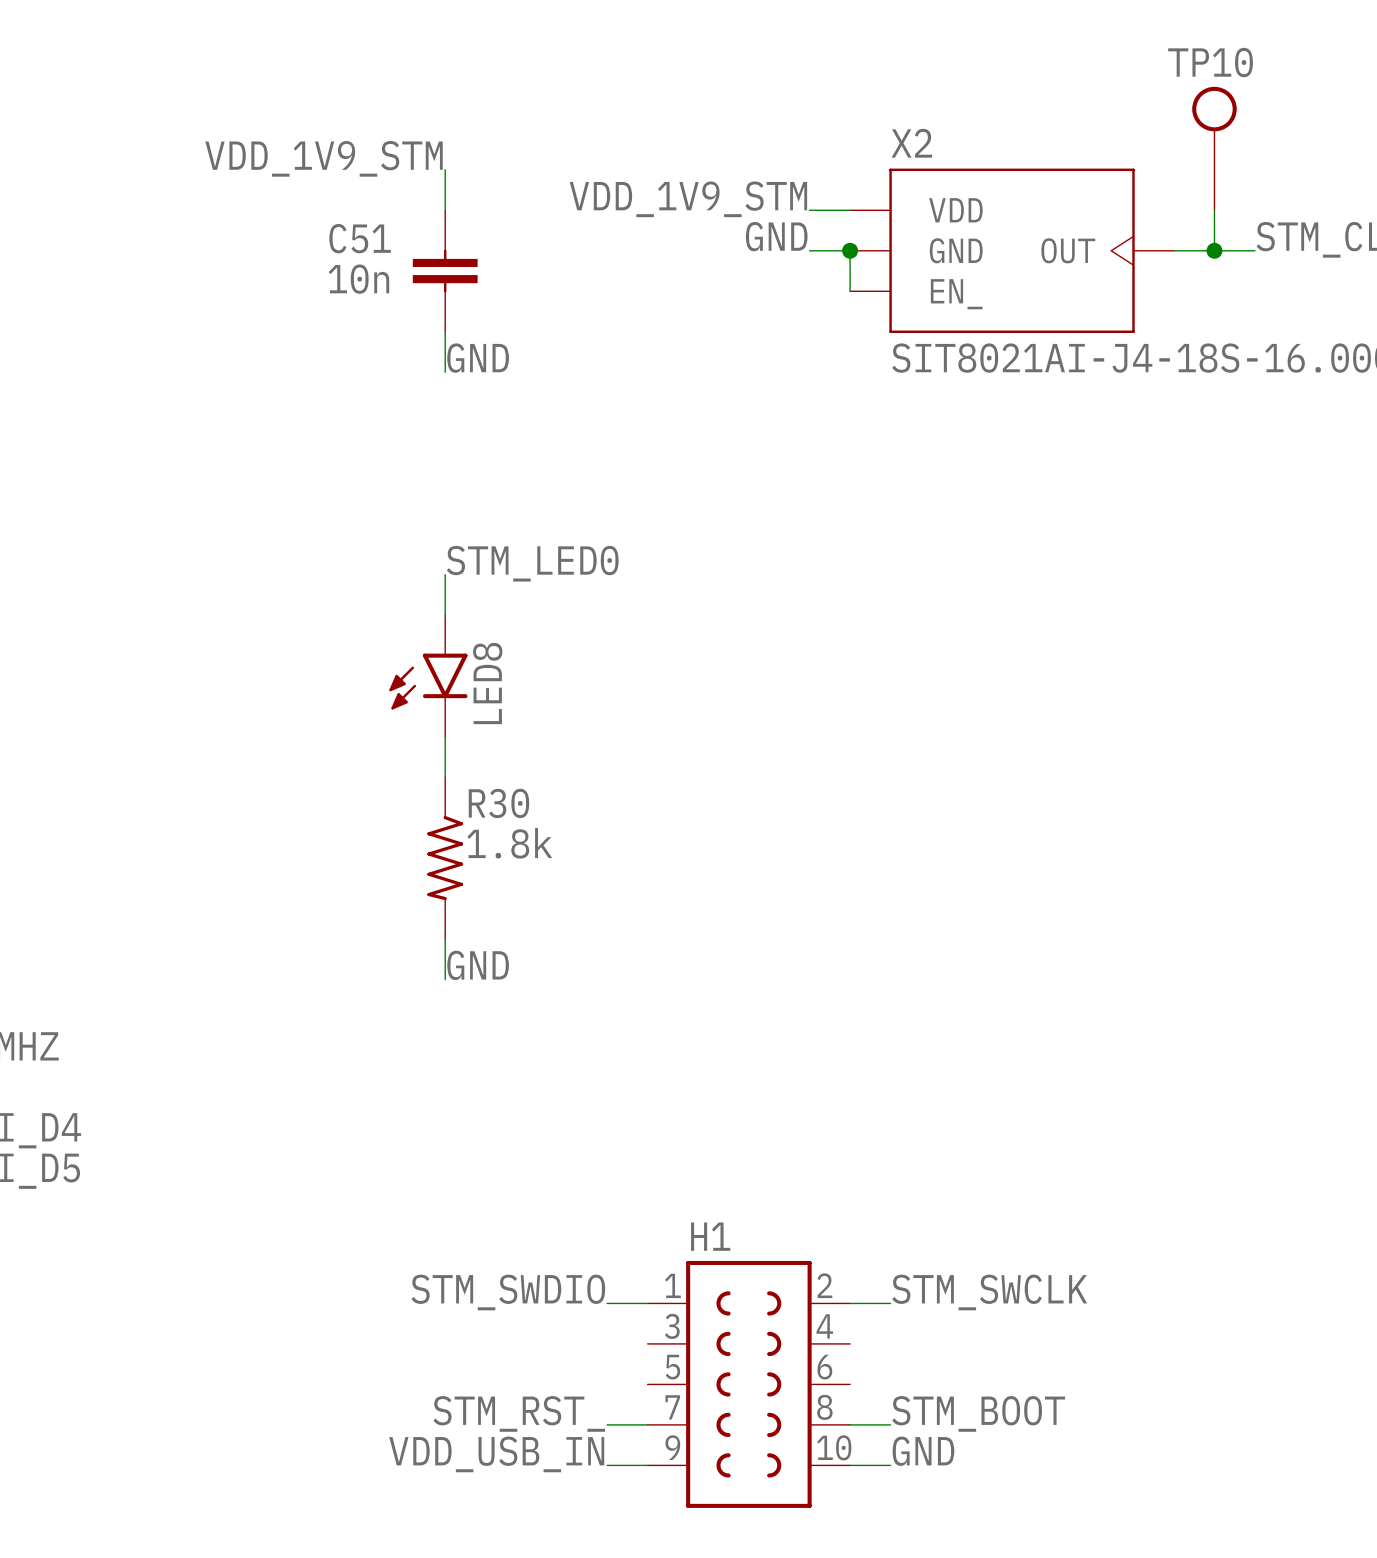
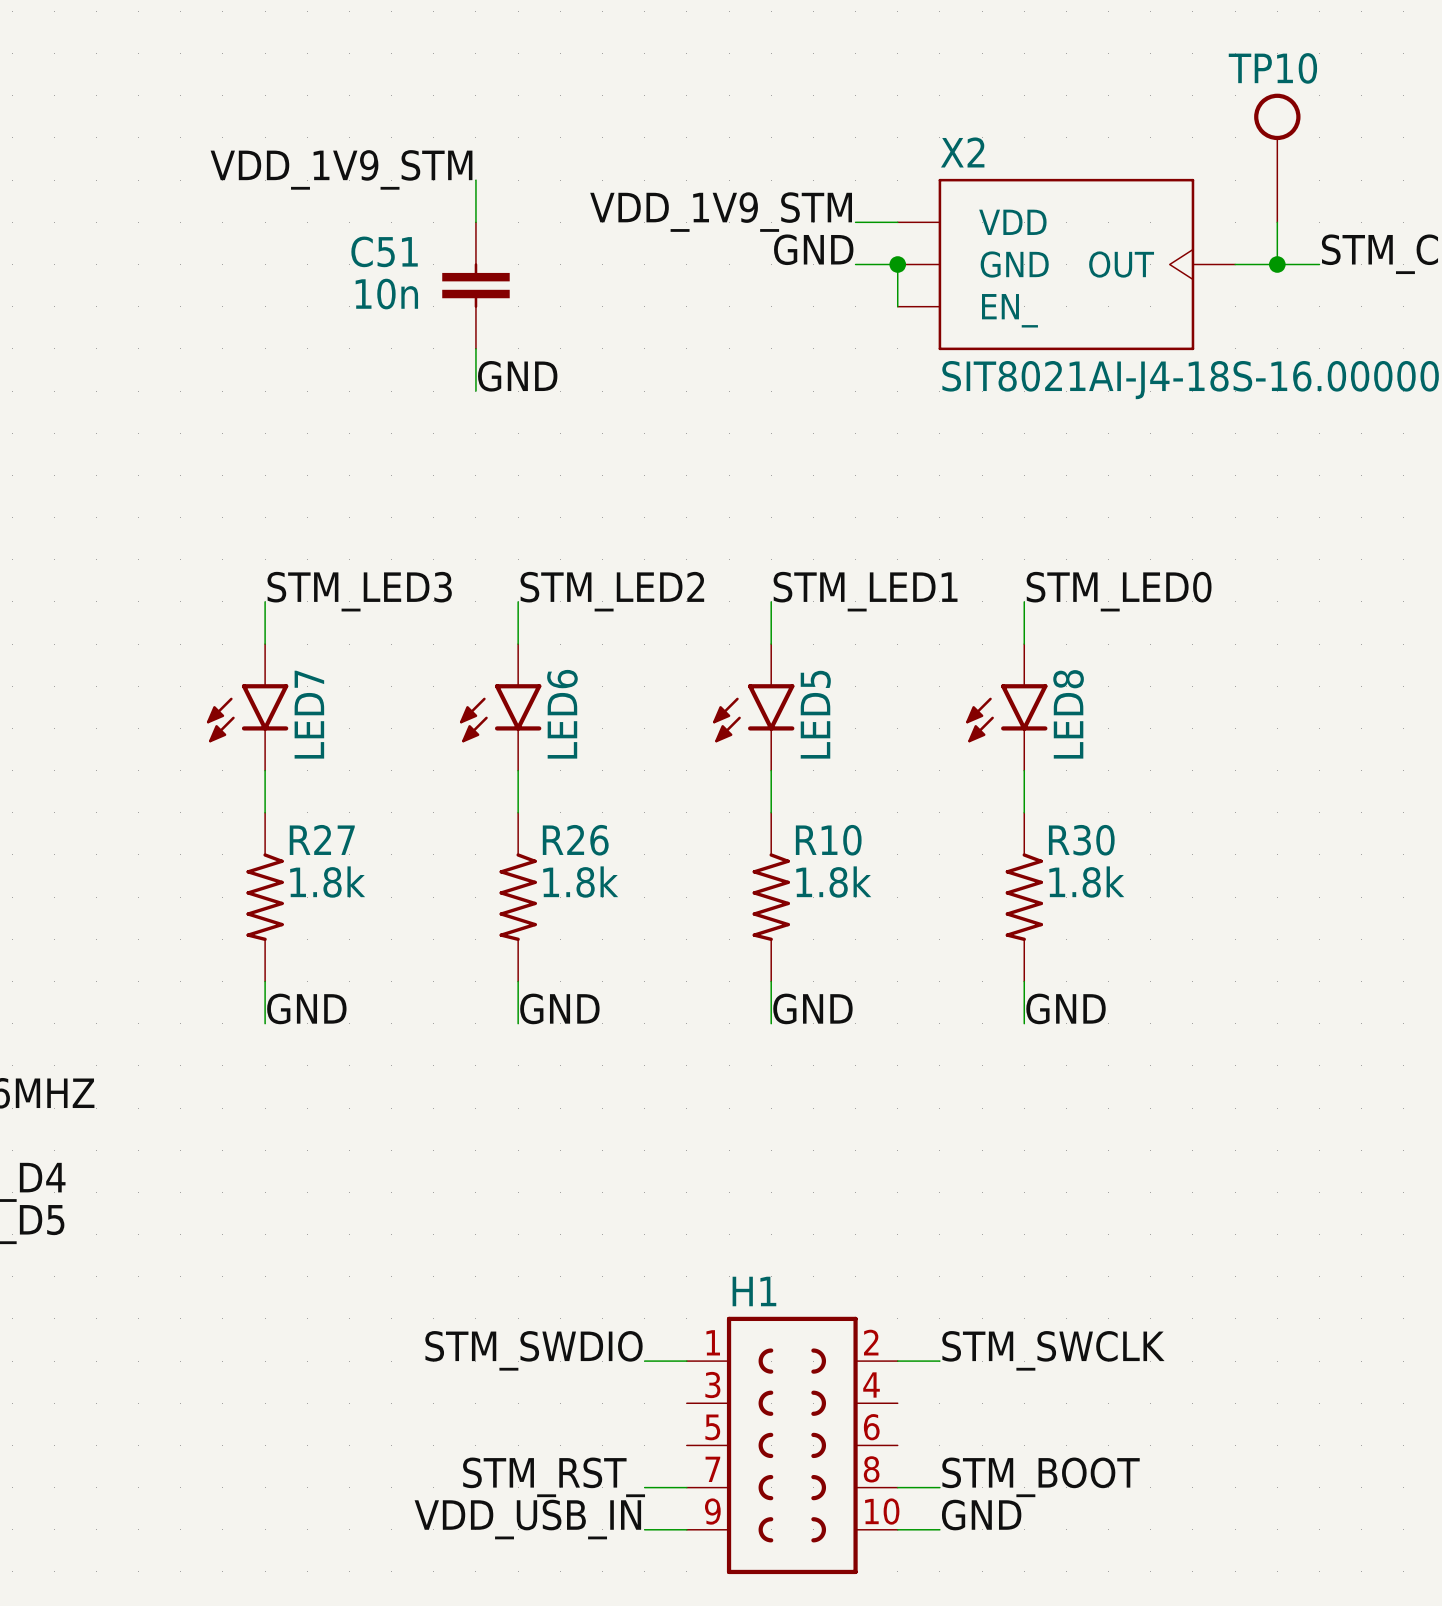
label: none -> STM_LED3 (359, 591)
label: STM_LED0 (532, 563) -> STM_LED2 (612, 591)
label: none -> STM_LED1 (865, 591)
label: none -> STM_LED0 (1119, 591)
wire: none -> (265, 601) (265, 644)
wire: (445, 574) (445, 615) -> (518, 601) (518, 644)
wire: none -> (771, 601) (771, 644)
wire: none -> (1024, 601) (1024, 644)
LED7: none -> (247, 707)
LED8 position: (428, 675) -> (1006, 707)
LED6: none -> (500, 707)
LED5: none -> (753, 707)
wire: none -> (265, 770) (265, 812)
wire: (445, 736) (445, 777) -> (518, 770) (518, 812)
wire: none -> (771, 770) (771, 812)
wire: none -> (1024, 770) (1024, 812)
R27: none -> 1.8k (265, 897)
R30 position: (445, 858) -> (1024, 897)
R26: none -> 1.8k (518, 897)
R10: none -> 1.8k (771, 897)
wire: none -> (265, 981) (265, 1023)
wire: (445, 939) (445, 979) -> (518, 981) (518, 1023)
wire: none -> (771, 981) (771, 1023)
wire: none -> (1024, 981) (1024, 1023)
label: none -> GND (306, 1008)
label position: GND (478, 965) -> GND (559, 1008)
label: none -> GND (812, 1008)
label: none -> GND (1065, 1008)

